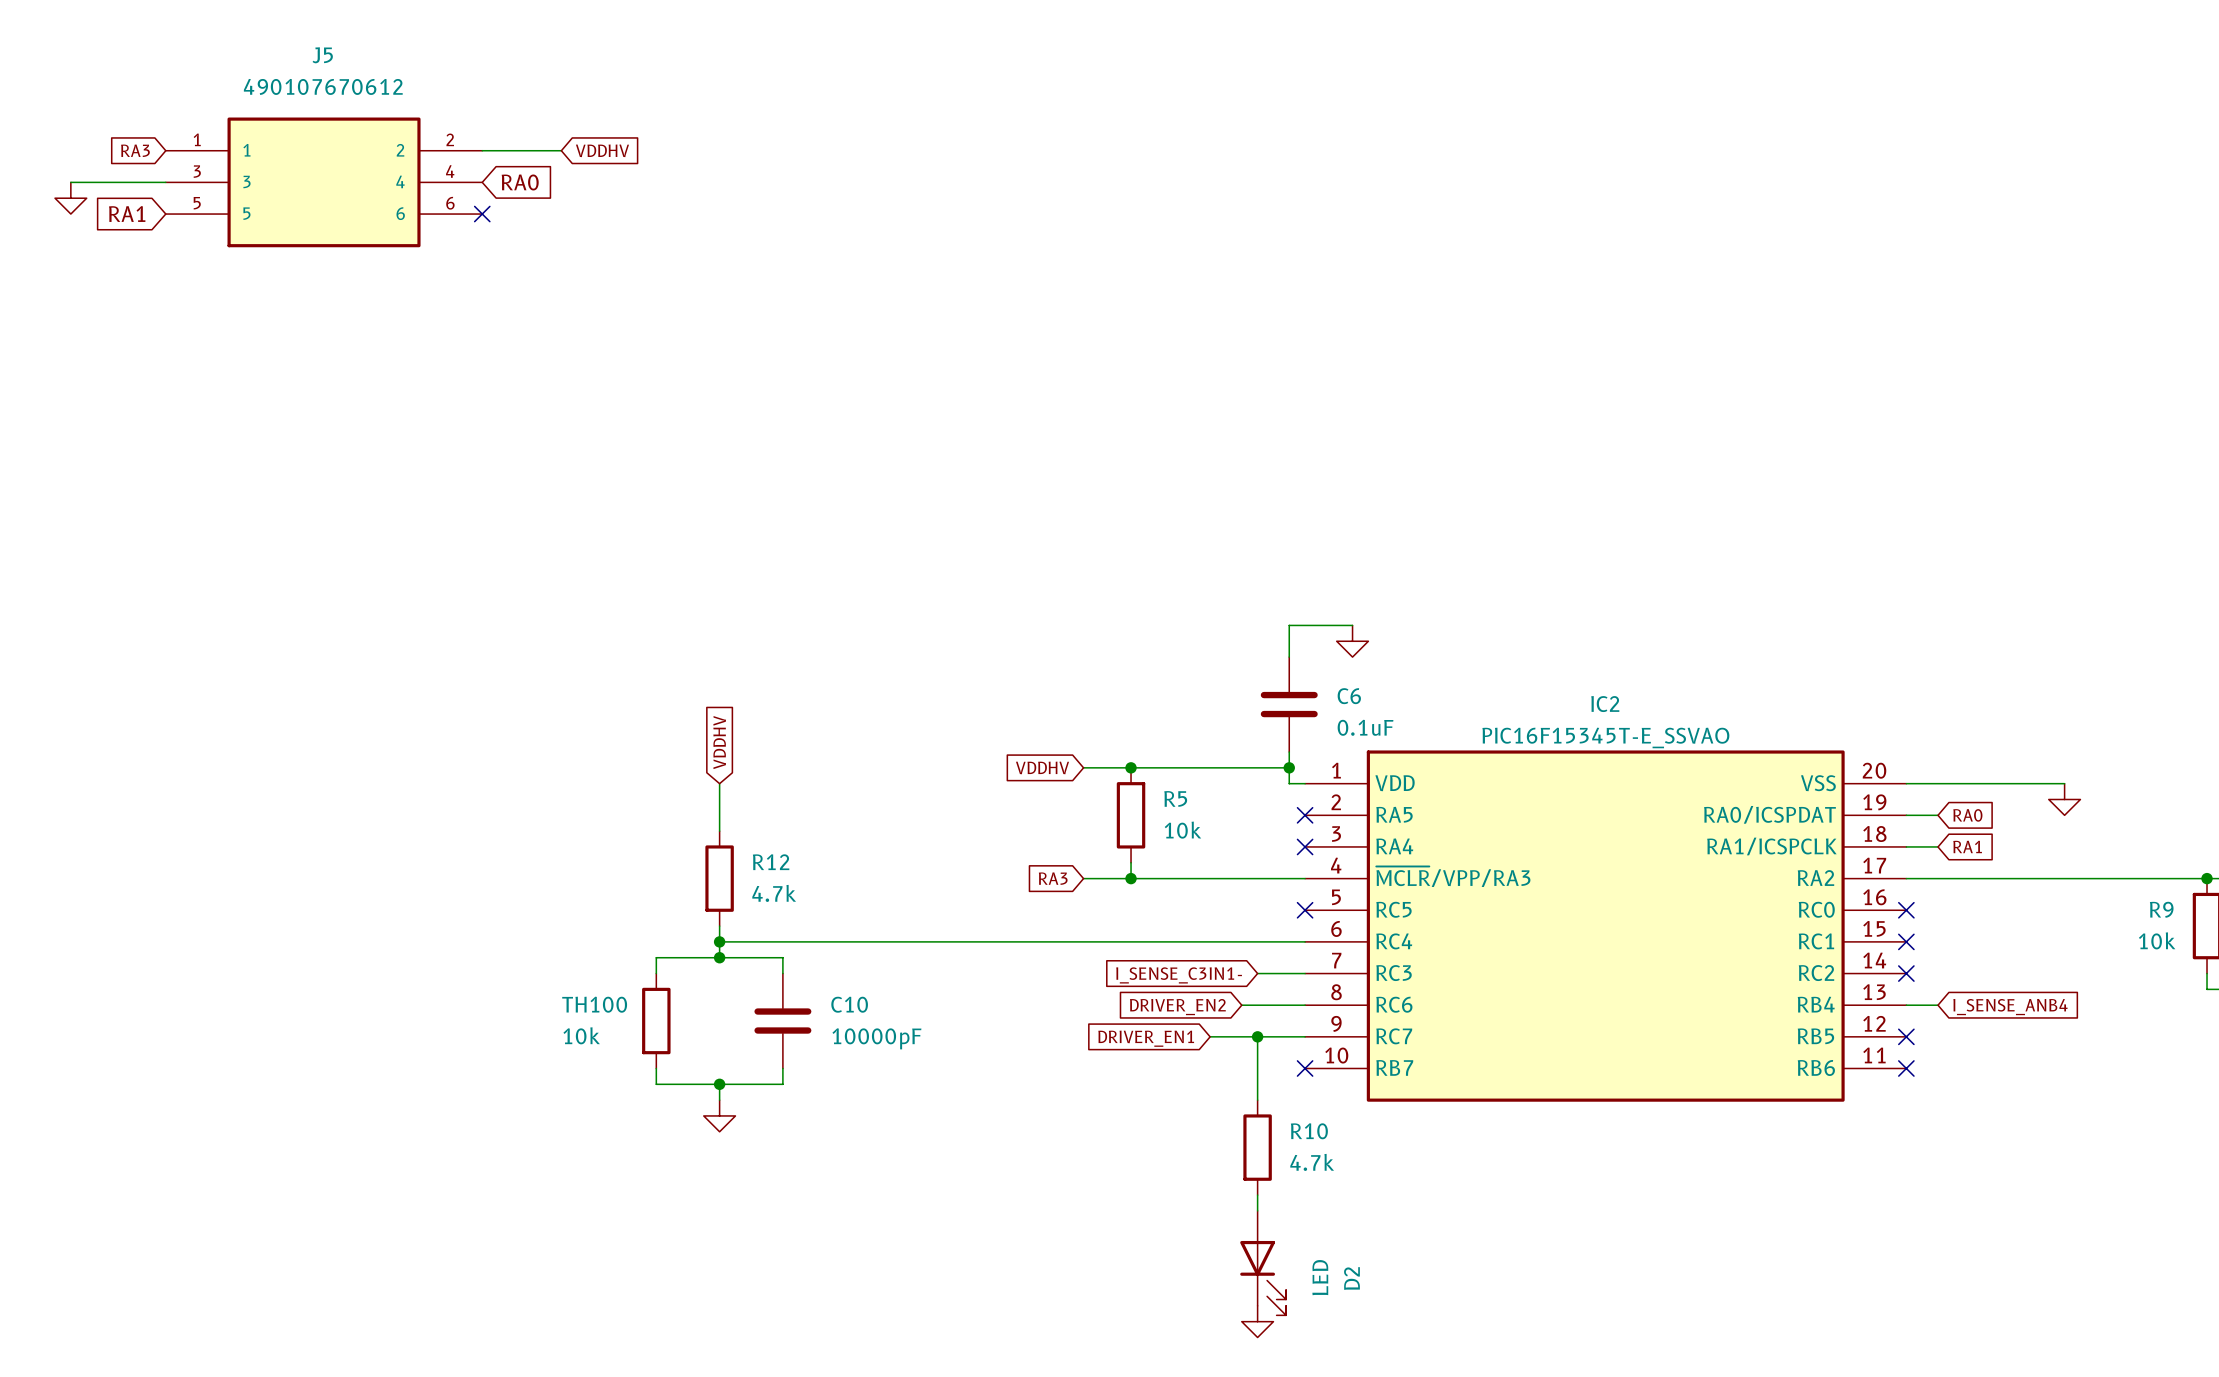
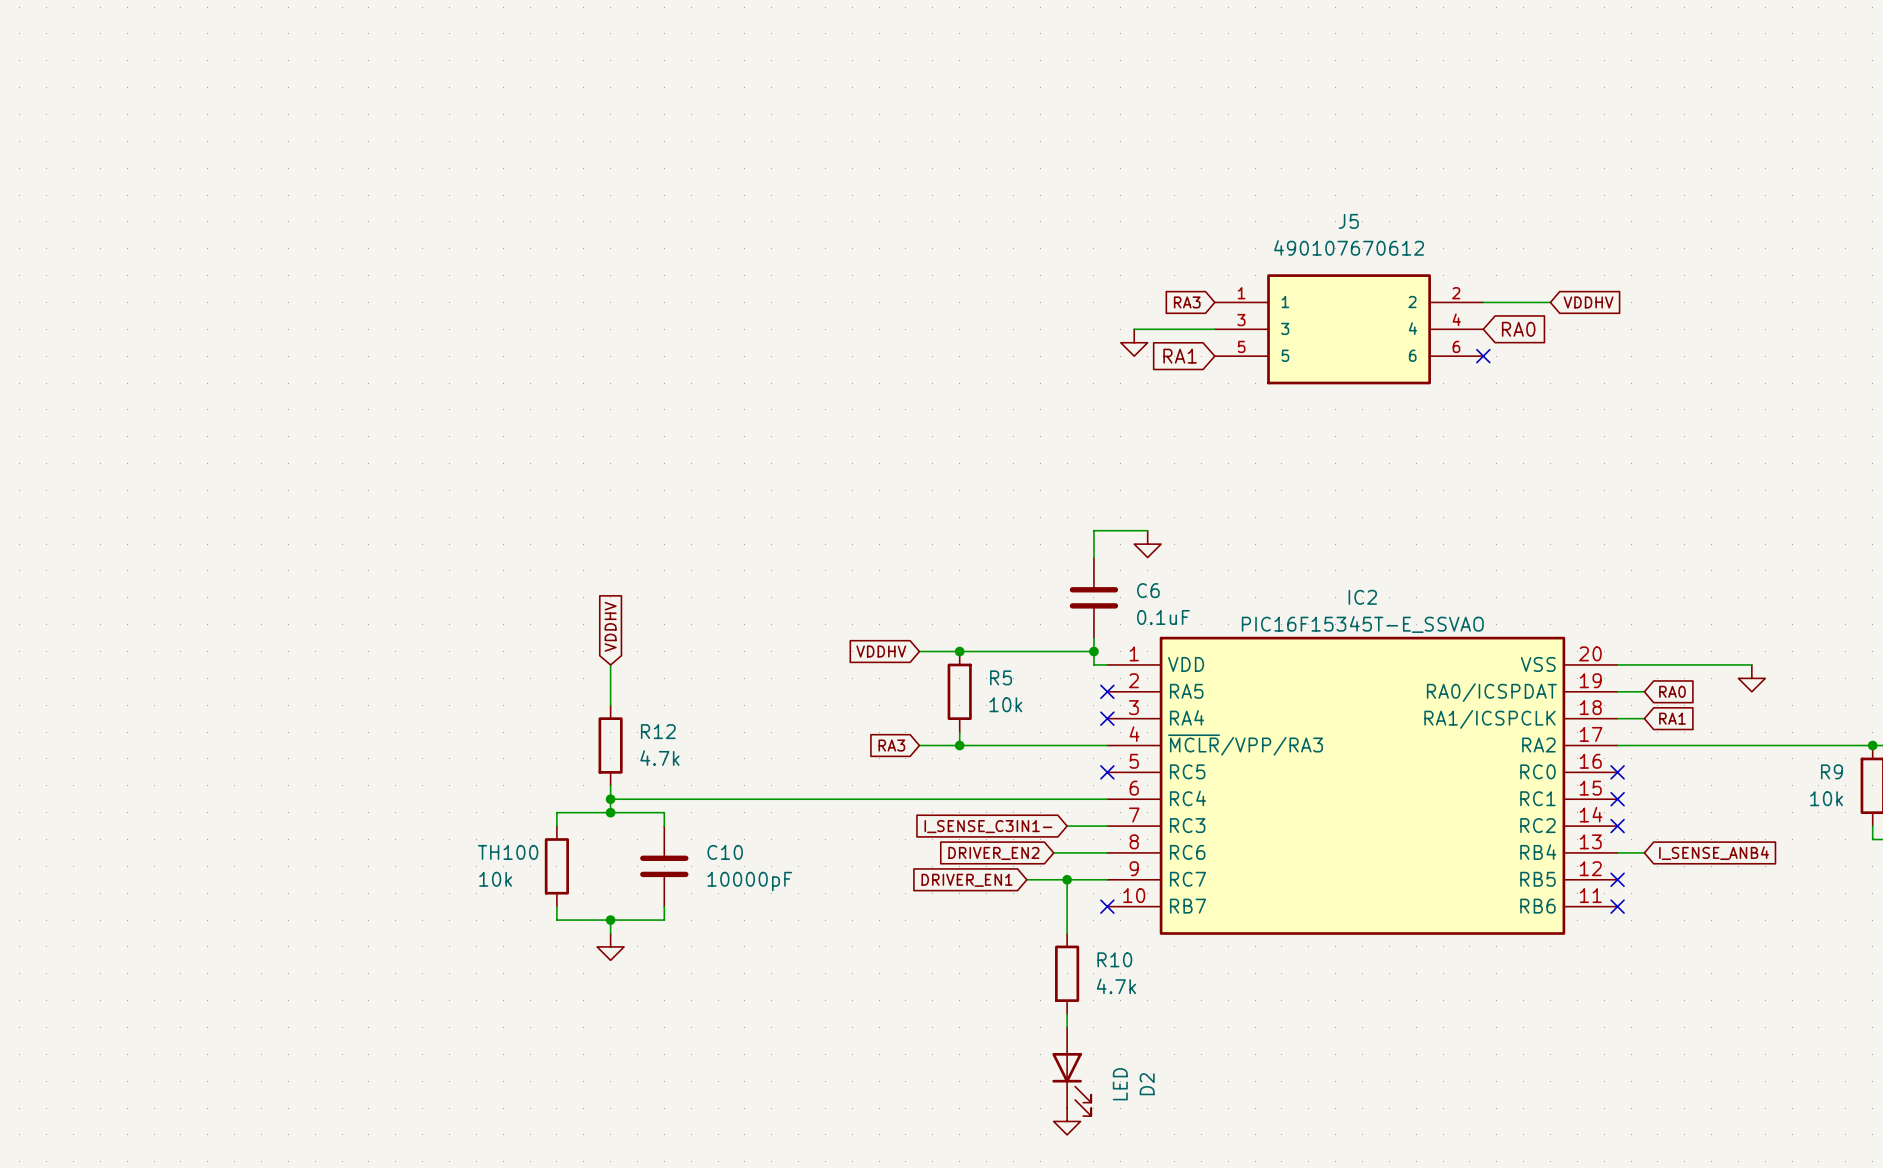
global label: RA3 (135, 150) -> none
wire: (482, 150) (561, 150) -> none
global label: VDDHV (602, 150) -> none
wire: (70, 182) (165, 182) -> none
J5 position: (324, 182) -> (1349, 329)
global label: RA0 (520, 182) -> none
power symbol: (70, 198) -> none
global label: RA1 (127, 214) -> none
no-connect mark: (482, 214) -> none
global label: none -> RA3 (1187, 302)
wire: none -> (1483, 302) (1550, 302)
global label: none -> VDDHV (1588, 302)
wire: none -> (1134, 329) (1214, 329)
global label: none -> RA0 (1518, 329)
power symbol: none -> (1134, 342)
global label: none -> RA1 (1180, 356)
no-connect mark: none -> (1483, 356)

